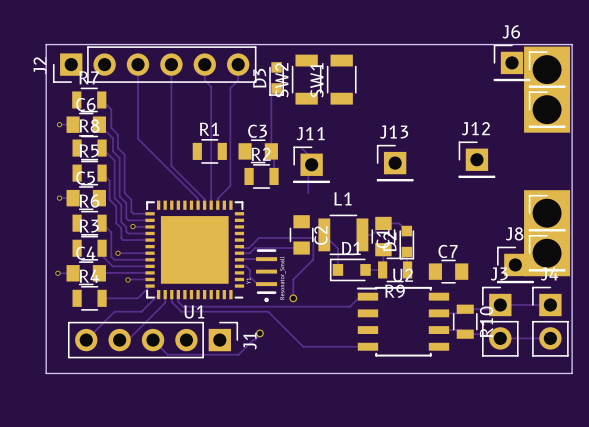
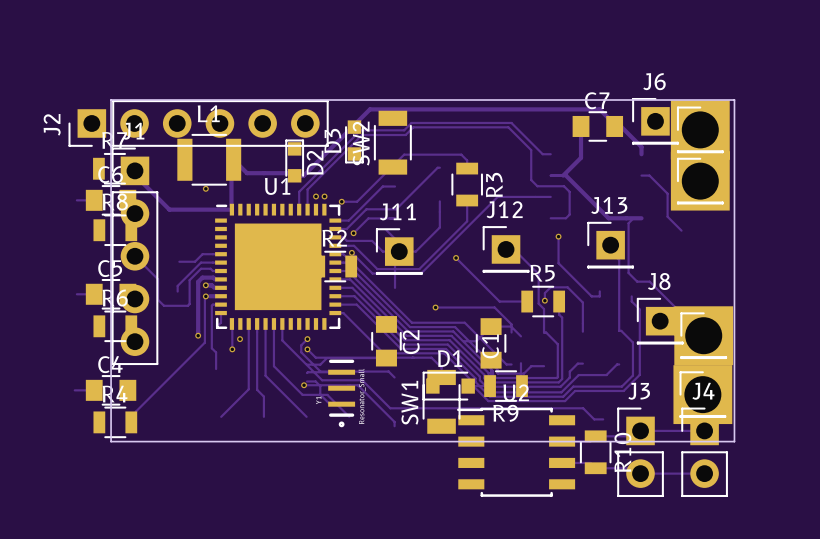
board edge: (46, 44) (572, 44) (572, 373) (46, 373) (46, 44) -> (111, 100) (111, 441) (734, 441) (734, 100) (111, 100)
track: (138, 64) (138, 138) (198, 198) (198, 205) -> none
track: (171, 64) (171, 166) (204, 199) (204, 205) -> none
track: (204, 64) (204, 80) (211, 86) (211, 205) -> none
track: (238, 64) (238, 80) (230, 88) (230, 185) (217, 198) (217, 205) -> none
track: none -> (581, 126) (581, 157) (563, 175)
SW1 position: (341, 79) -> (441, 401)
track: (276, 88) (271, 93) (271, 151) (274, 154) (274, 176) -> none
track: none -> (550, 154) (542, 154) (511, 122) (411, 122) (404, 130) (360, 130) (299, 191) (299, 209)
track: none -> (641, 154) (641, 147) (620, 126) (614, 126) (599, 109) (369, 109) (303, 175) (294, 175) (292, 173) (247, 173) (233, 159) (231, 161) (231, 205)
track: (101, 99) (111, 109) (111, 128) (117, 134) (117, 148) (124, 154) (124, 193) (131, 199) (131, 211) (133, 213) (150, 213) -> none
track: none -> (439, 167) (396, 209) (366, 209) (346, 228) (335, 228)
track: none -> (467, 168) (467, 160) (461, 154) (404, 154) (357, 201) (341, 201)
track: none -> (134, 170) (134, 175) (169, 209) (231, 209) (231, 205)
track: none -> (550, 175) (565, 175) (608, 218) (641, 218) (633, 218) (628, 223) (628, 273) (637, 281) (649, 281) (703, 335)
track: none -> (641, 175) (649, 175) (667, 193) (667, 216) (681, 230)
track: none -> (395, 186) (382, 186) (348, 220) (335, 220)
via: none -> (205, 188)
via: none -> (316, 196)
via: none -> (324, 196)
track: none -> (550, 196) (497, 196) (421, 273) (372, 273) (351, 252)
via: (59, 124) -> none
track: (99, 124) (112, 138) (112, 151) (119, 158) (119, 196) (126, 203) (126, 218) (128, 220) (150, 220) -> none
track: none -> (467, 200) (467, 221) (419, 269) (377, 269) (354, 245) (335, 245)
via: none -> (341, 201)
track: none -> (439, 201) (439, 227) (415, 251) (382, 251) (372, 240) (346, 240) (343, 237) (335, 237)
J12 name: J12 (475, 128) -> J13 (609, 205)
track: none -> (307, 209) (307, 189) (362, 135) (405, 135) (413, 127) (508, 127) (531, 150) (531, 180) (537, 186) (564, 186) (569, 191) (569, 214) (565, 218) (550, 218)
J13 name: J13 (394, 132) -> J12 (504, 209)
track: none -> (395, 218) (368, 218) (353, 233)
track: (102, 148) (114, 160) (114, 198) (121, 204) (121, 222) (126, 227) (126, 231) (128, 233) (150, 233) -> none
via: none -> (353, 233)
R1: (209, 151) -> none
C3: (258, 151) -> none
track: none -> (558, 236) (558, 263) (591, 296) (599, 296) (599, 291)
via: none -> (558, 236)
track: none -> (608, 249) (619, 260) (619, 330) (632, 342) (632, 375) (621, 386) (573, 386) (563, 396) (490, 396) (475, 382) (475, 378) (446, 348) (401, 348) (356, 304) (335, 304)
via: none -> (351, 252)
track: none -> (500, 252) (517, 252) (538, 274) (538, 303) (544, 309) (544, 332) (557, 344) (557, 378) (496, 378) (493, 374) (493, 371) (453, 331) (408, 331) (347, 271) (335, 271)
track: none -> (221, 254) (202, 254) (195, 261) (179, 261)
track: none -> (335, 254) (343, 254) (411, 322) (464, 322) (506, 364) (511, 364)
track: none -> (134, 256) (158, 279) (158, 299) (164, 305) (187, 305) (189, 304) (189, 280) (201, 268) (221, 271)
track: none -> (456, 257) (499, 301) (527, 301)
via: none -> (456, 257)
R5 position: (89, 173) -> (543, 301)
track: (102, 173) (109, 180) (109, 199) (116, 206) (116, 223) (121, 228) (121, 238) (123, 240) (150, 240) -> none
track: none -> (221, 262) (201, 262) (177, 285) (177, 291)
track: none -> (335, 262) (345, 262) (410, 327) (455, 327) (497, 369) (498, 373) (523, 373) (531, 366) (544, 366)
track: none -> (221, 279) (202, 277) (198, 281) (198, 335)
track: none -> (335, 279) (350, 279) (406, 335) (451, 335) (488, 373) (488, 376) (494, 382) (558, 382) (562, 379) (562, 317) (559, 314) (559, 301)
track: none -> (205, 285) (221, 287)
via: none -> (205, 285)
track: none -> (335, 287) (352, 287) (404, 340) (449, 340) (484, 374) (484, 378) (492, 386) (560, 386) (569, 377) (569, 371) (577, 363) (582, 363)
via: (59, 198) -> none
via: none -> (205, 296)
track: none -> (221, 296) (204, 297) (204, 342) (135, 411) (135, 416)
track: none -> (335, 296) (354, 296) (402, 344) (447, 344) (479, 376) (479, 380) (492, 392) (561, 392) (578, 375) (606, 375) (619, 364)
track: none -> (631, 296) (631, 301) (639, 309) (639, 374) (623, 390) (575, 390) (565, 401) (488, 401) (444, 353) (383, 353) (343, 313) (335, 313)
track: none -> (544, 300) (544, 293) (550, 287) (567, 287) (582, 302) (582, 331)
via: none -> (544, 300)
track: none -> (221, 304) (211, 305) (211, 348) (216, 352) (216, 369)
track: none -> (435, 307) (494, 307) (511, 324) (511, 332)
via: none -> (435, 307)
track: none -> (221, 313) (221, 322) (218, 325)
part: (547, 213) -> none
track: none -> (231, 323) (232, 349)
track: none -> (248, 323) (248, 389) (221, 416)
track: none -> (257, 323) (257, 389) (263, 396) (263, 416)
track: none -> (265, 323) (265, 375) (306, 416)
track: none -> (273, 323) (273, 366) (302, 394) (327, 394) (349, 416)
track: none -> (282, 323) (282, 340) (322, 380) (362, 380) (390, 408) (583, 408) (594, 419) (603, 419)
track: (102, 223) (111, 232) (111, 256) (114, 259) (150, 259) -> none
track: (133, 226) (150, 226) -> none
via: (133, 226) -> none
via: none -> (198, 335)
part: none -> (703, 335)
via: none -> (240, 339)
track: none -> (307, 339) (301, 345) (301, 352) (320, 371) (388, 371)
via: none -> (307, 339)
track: (324, 234) (337, 248) (337, 269) -> none
L1 position: (343, 234) -> (209, 159)
via: none -> (232, 349)
track: none -> (307, 349) (315, 357) (431, 357) (441, 367) (441, 377)
via: none -> (307, 349)
D2 rotation: 0° (406, 242) -> 180° (294, 161)
D2 position: (406, 242) -> (294, 161)
track: (239, 246) (248, 248) (259, 237) (312, 237) (313, 259) (293, 279) (293, 298) -> none
R3 rotation: 0° (89, 248) -> 90° clockwise (467, 184)
R3 position: (89, 248) -> (467, 184)
track: (102, 248) (102, 255) (112, 266) (150, 266) -> none
U1 rotation: 0° (194, 249) -> 180° (278, 266)
U1 position: (194, 249) -> (278, 266)
via: (117, 253) -> none
track: (118, 253) (150, 253) -> none
part: (547, 253) -> none
track: none -> (388, 371) (394, 377)
J8 position: (515, 264) -> (660, 321)
track: none -> (304, 385) (357, 385) (394, 421) (394, 426)
via: none -> (304, 385)
C7 position: (448, 271) -> (597, 126)
track: (150, 272) (99, 273) -> none
via: (57, 273) -> none
part: none -> (702, 394)
via: (127, 279) -> none
track: (150, 279) (127, 279) -> none
track: (150, 286) (137, 298) (102, 298) -> none
track: (158, 294) (141, 311) (114, 311) (86, 340) -> none
track: (165, 294) (165, 302) (127, 340) (119, 340) -> none
track: (171, 294) (171, 302) (181, 311) (268, 311) (303, 346) (367, 346) -> none
track: (178, 294) (178, 301) (183, 306) (350, 306) (360, 296) (367, 296) -> none
via: (293, 298) -> none
track: (259, 333) (238, 354) (167, 354) (153, 340) -> none
via: (259, 333) -> none
J1 rotation: 0° (153, 340) -> 90° counterclockwise (134, 256)
J1 position: (153, 340) -> (134, 256)

